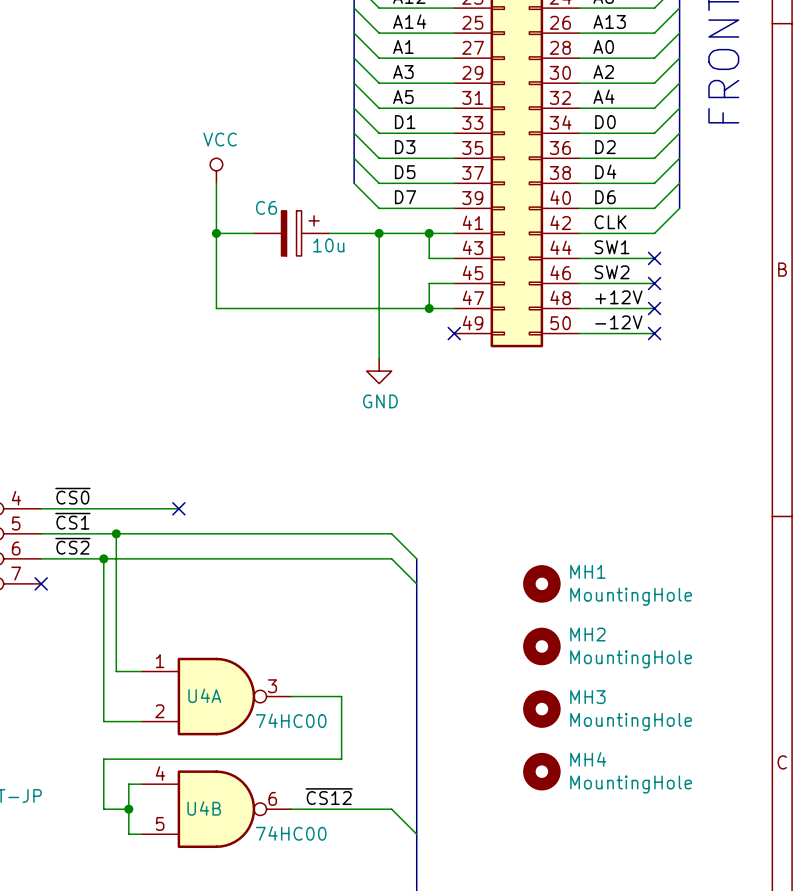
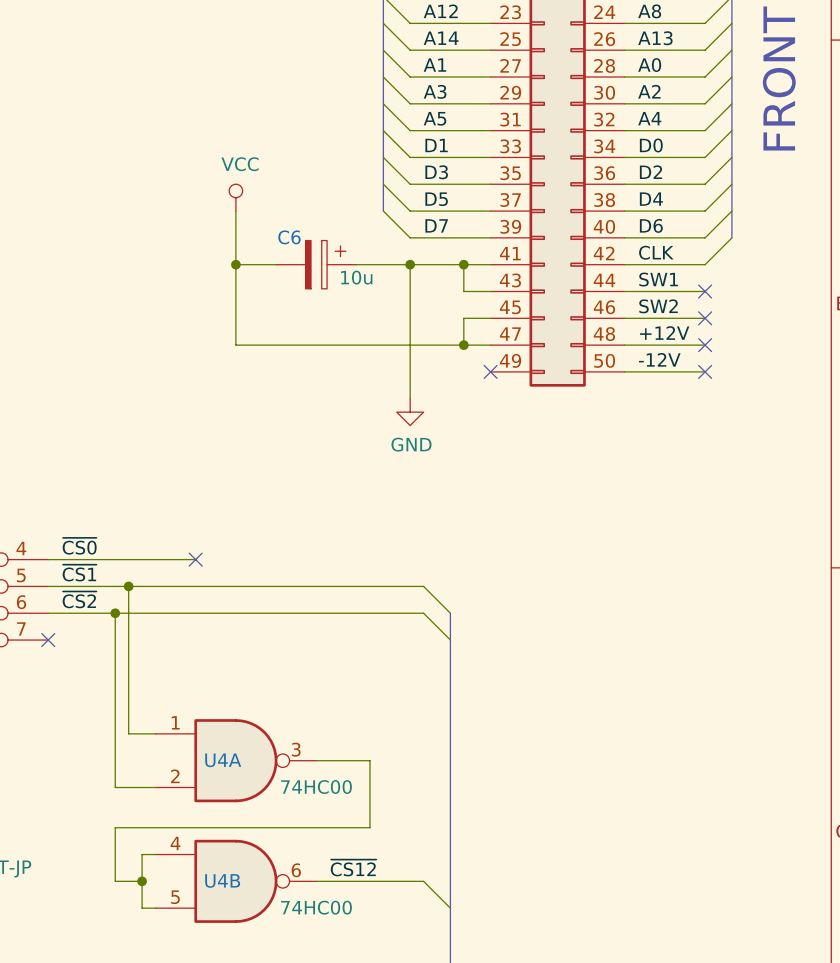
MH1: MountingHole (541, 583) -> none
MH2: MountingHole (541, 646) -> none
MH3: MountingHole (541, 709) -> none
MH4: MountingHole (541, 771) -> none

